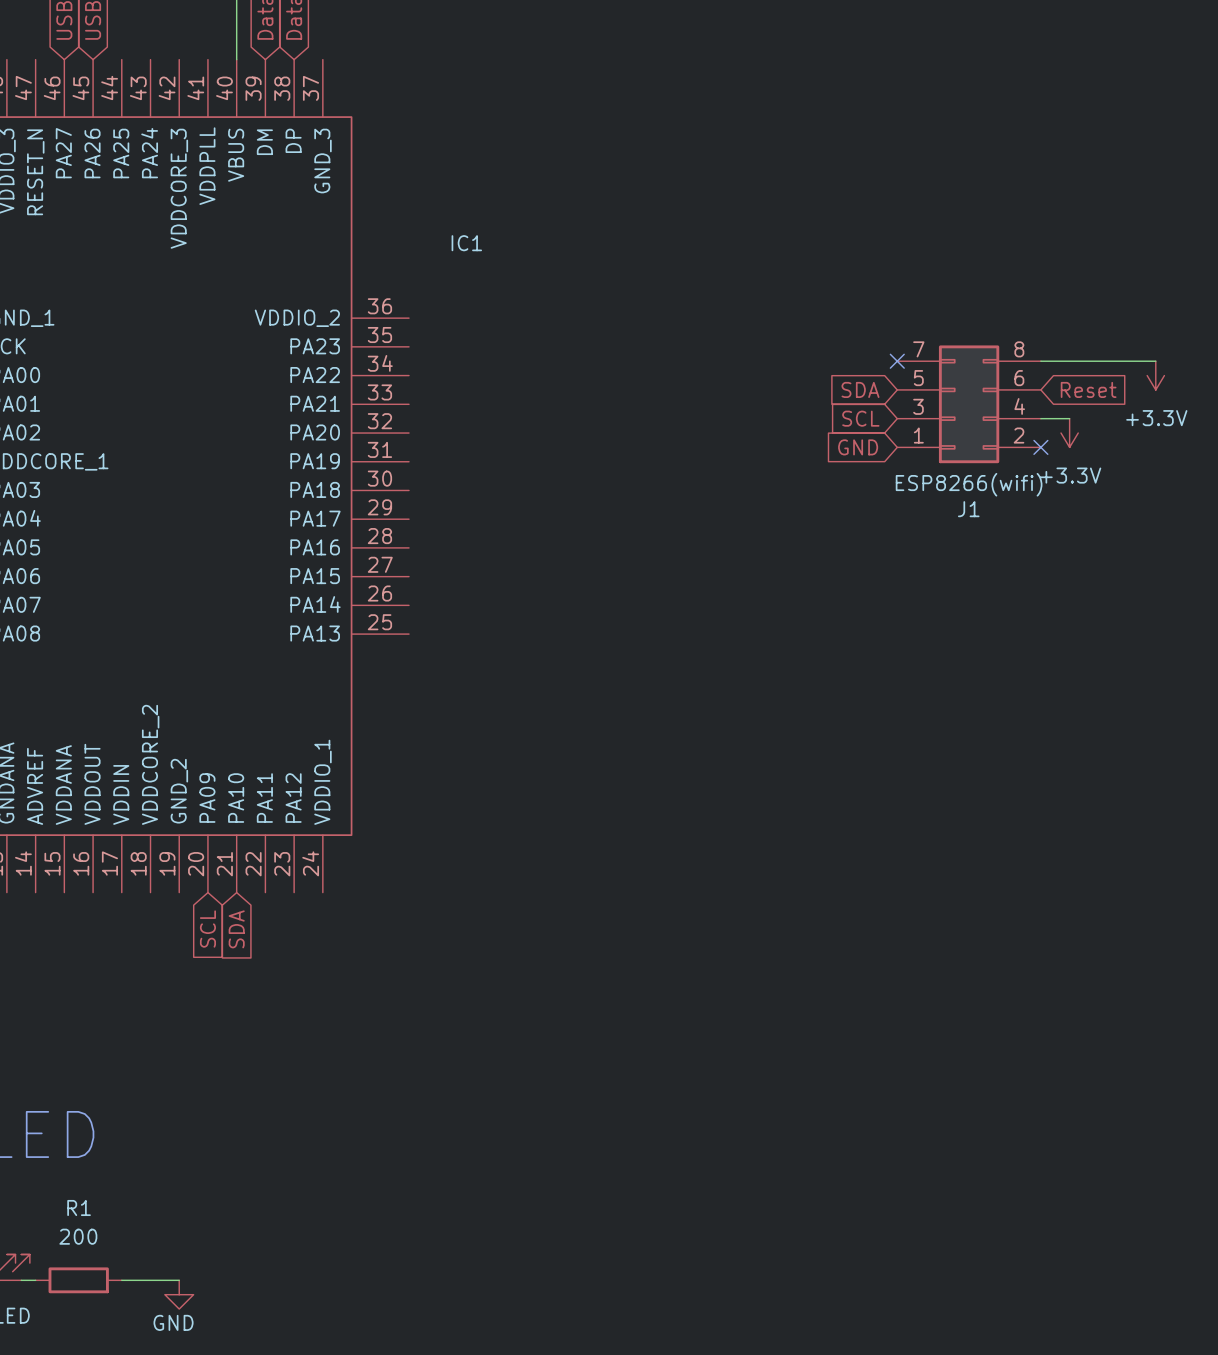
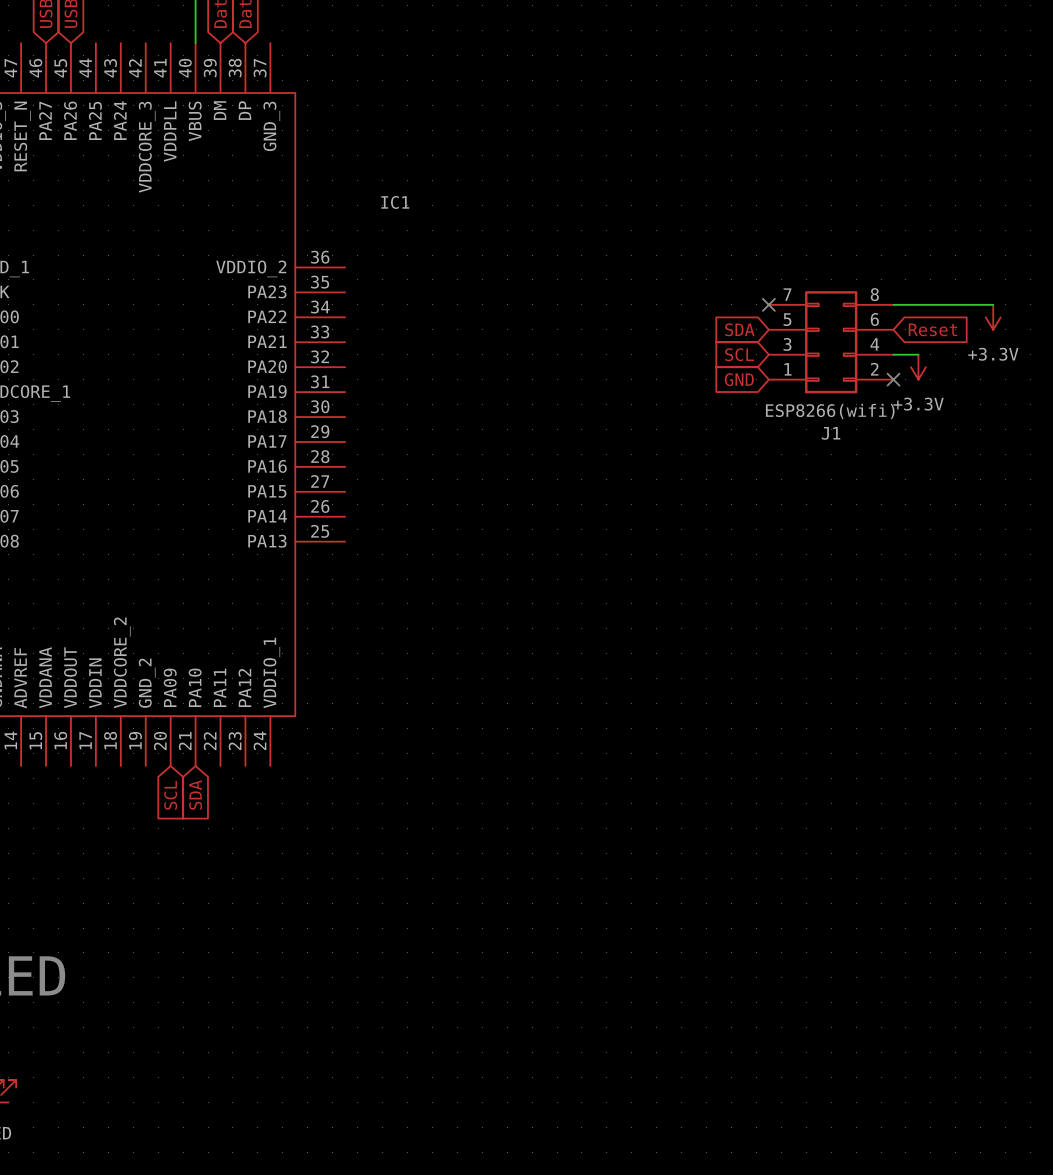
wire: (21, 1280) (35, 1280) -> none
R1: 200 (78, 1280) -> none
wire: (121, 1280) (179, 1280) -> none
power symbol: GND (179, 1294) -> none

